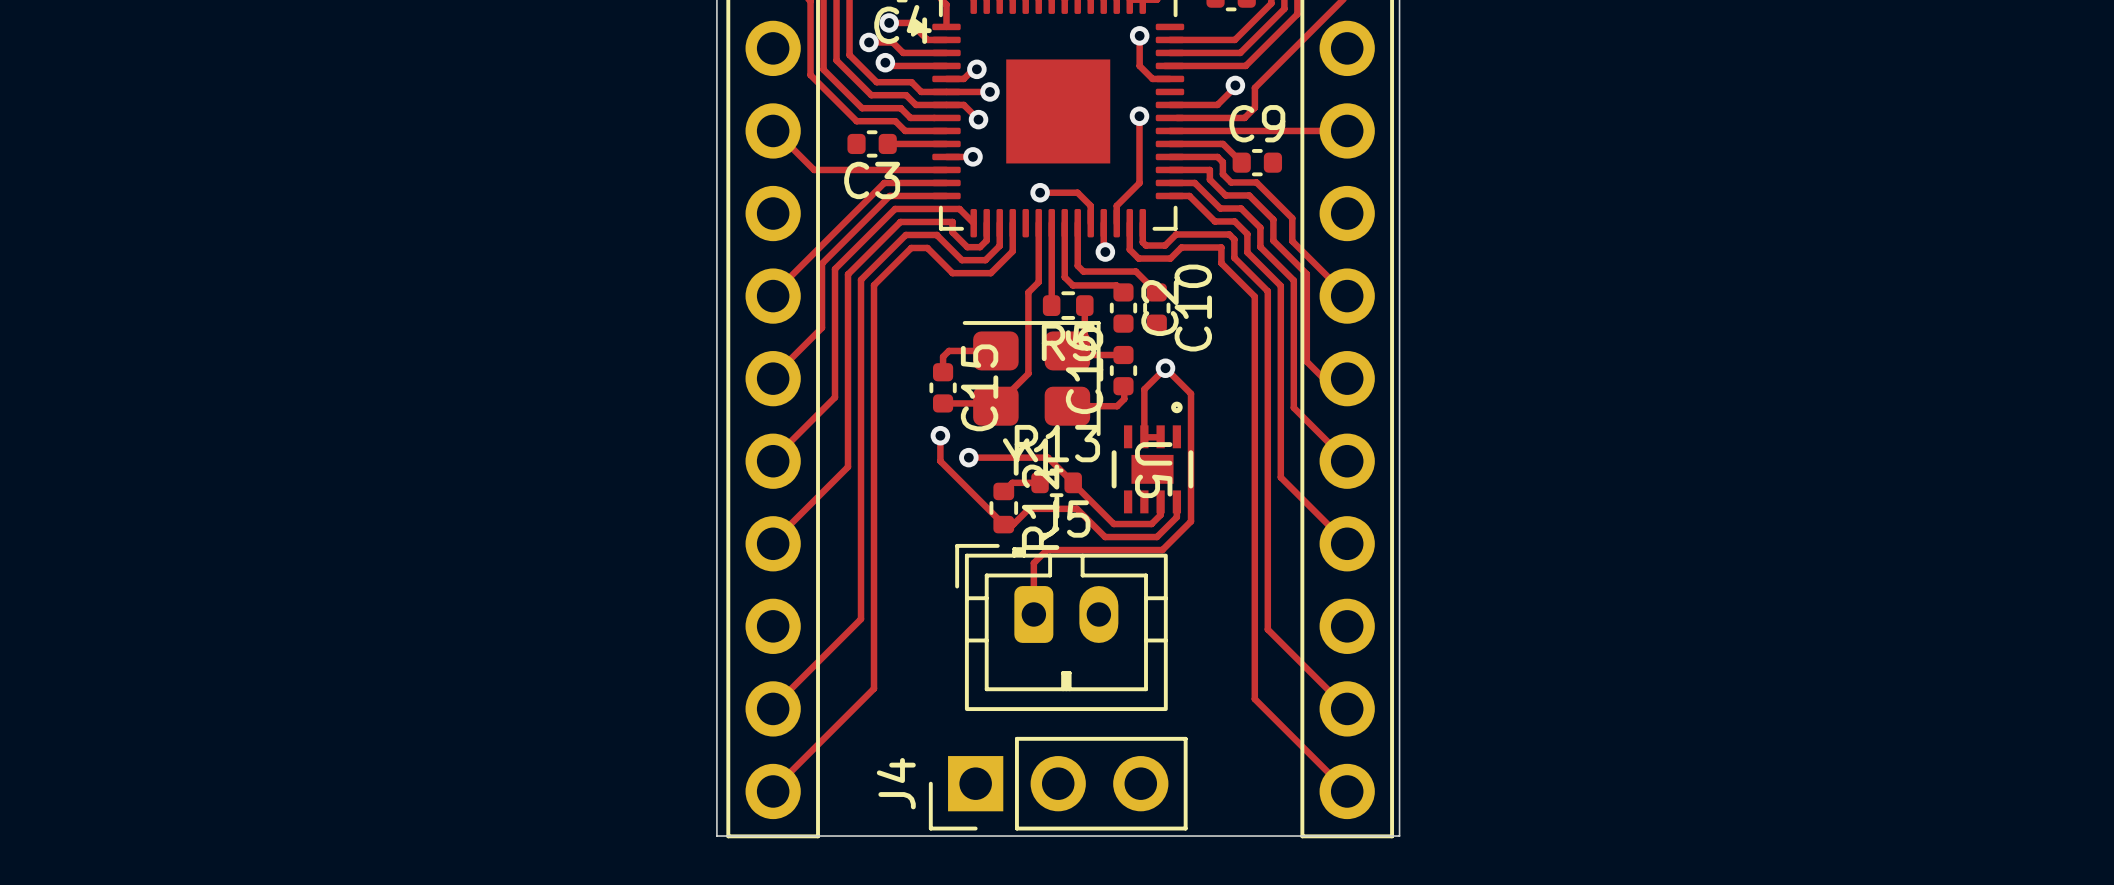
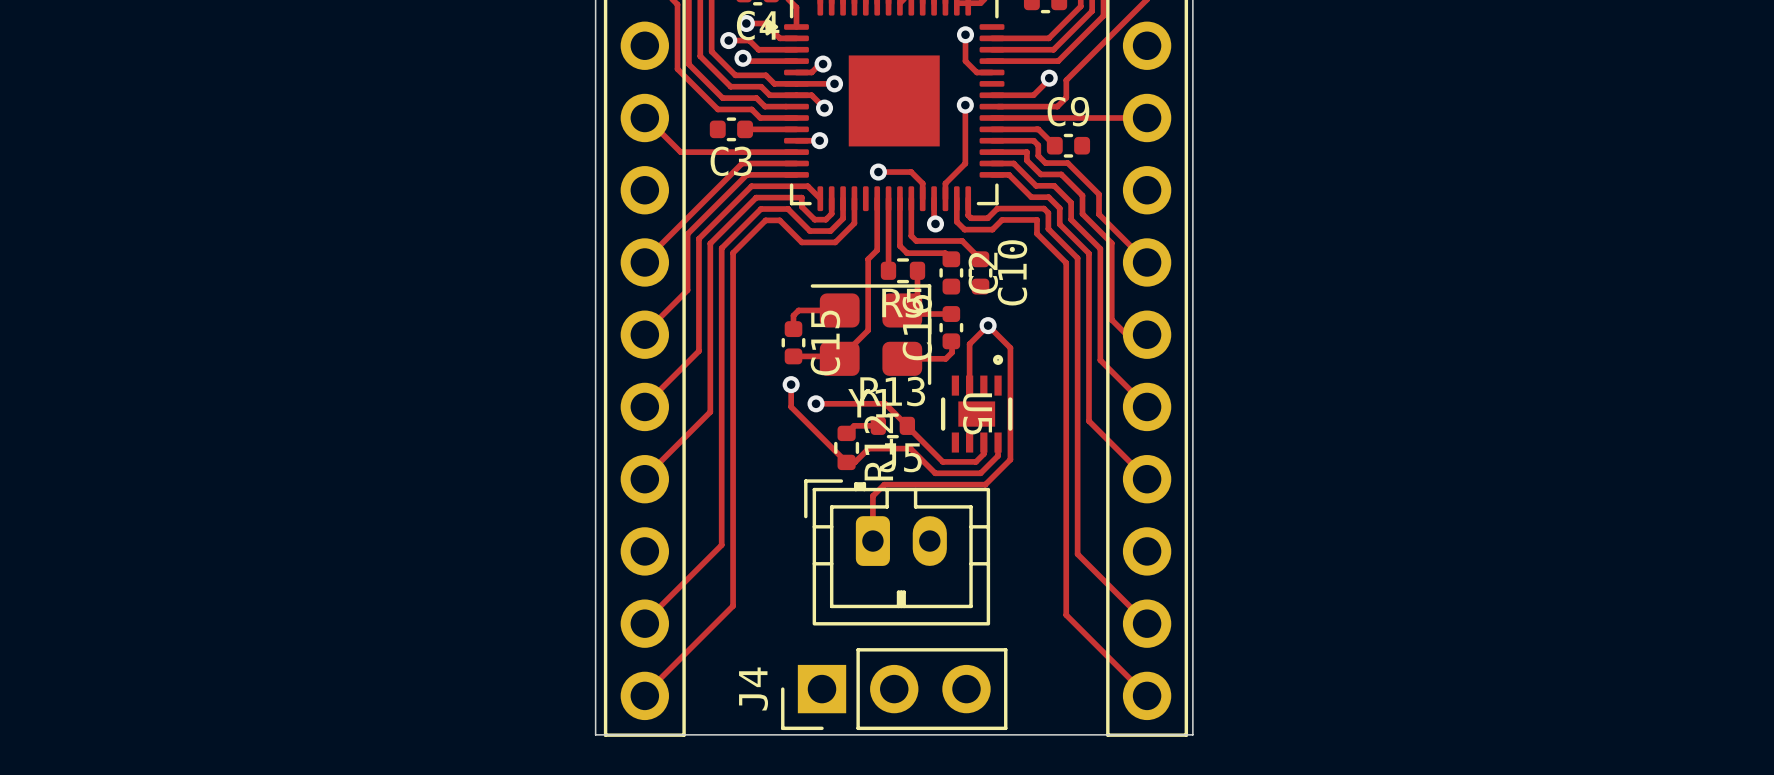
track: (1144, 437) (1160, 437) -> none

